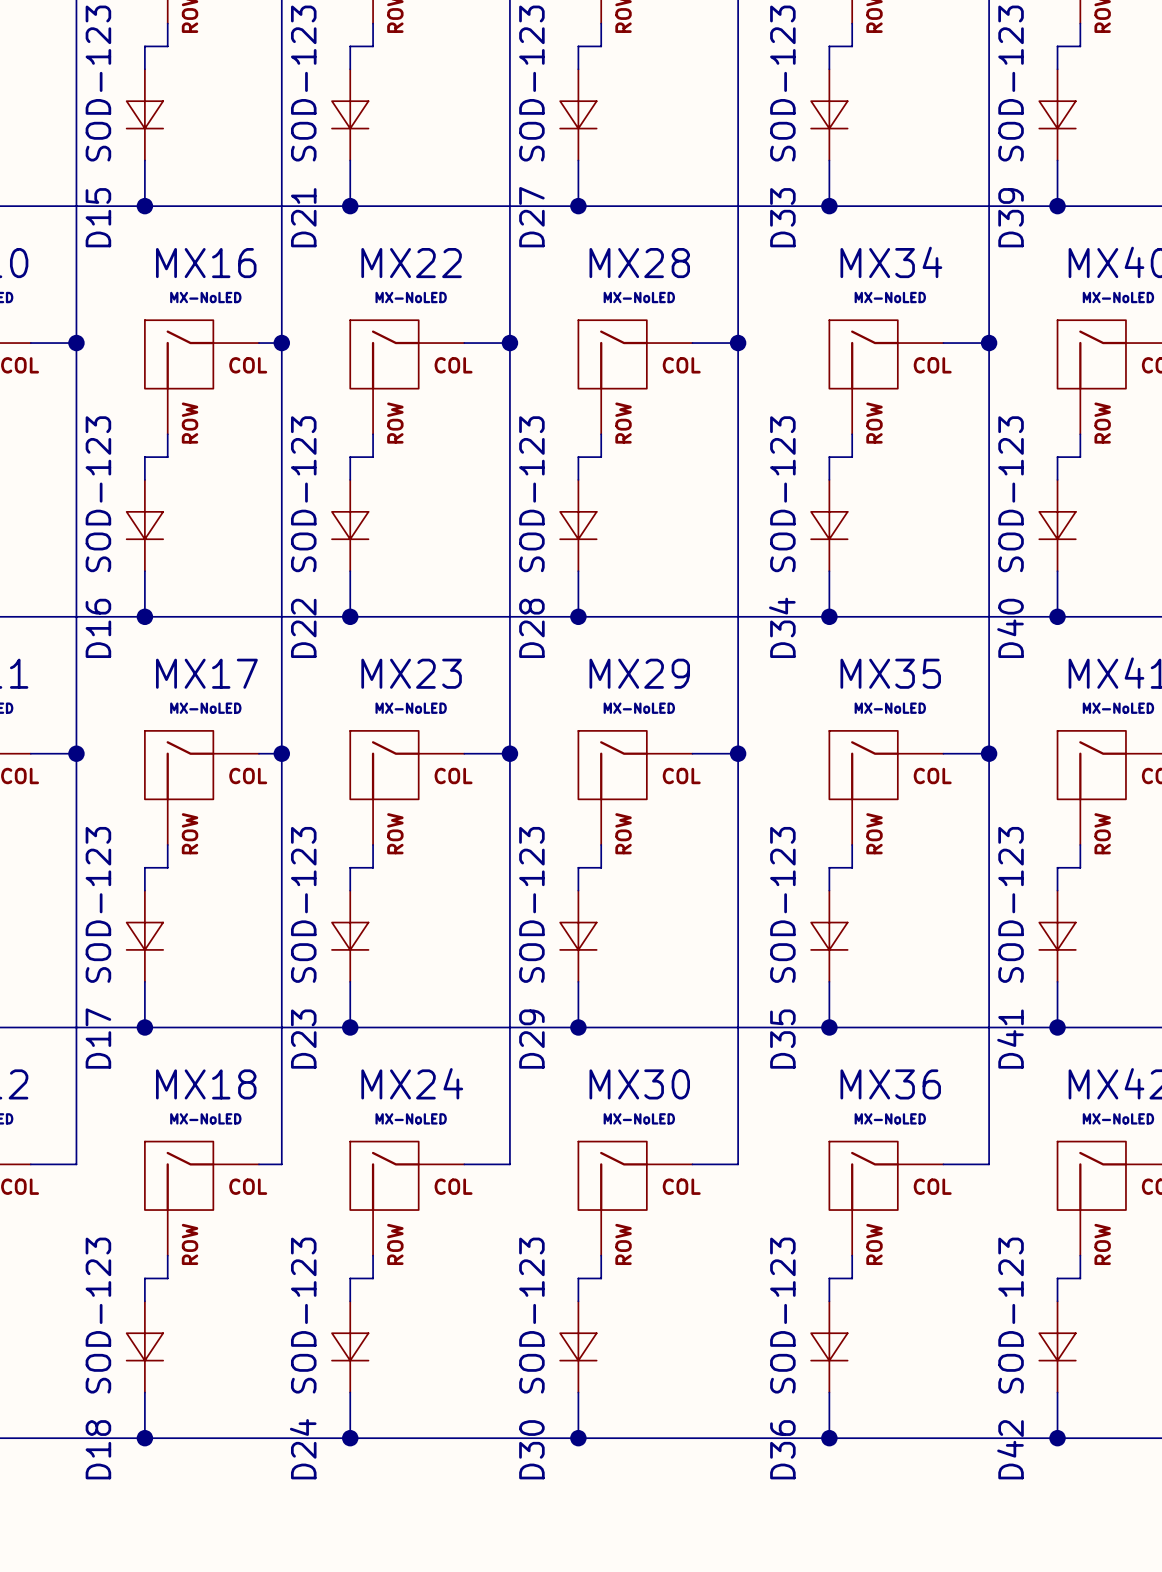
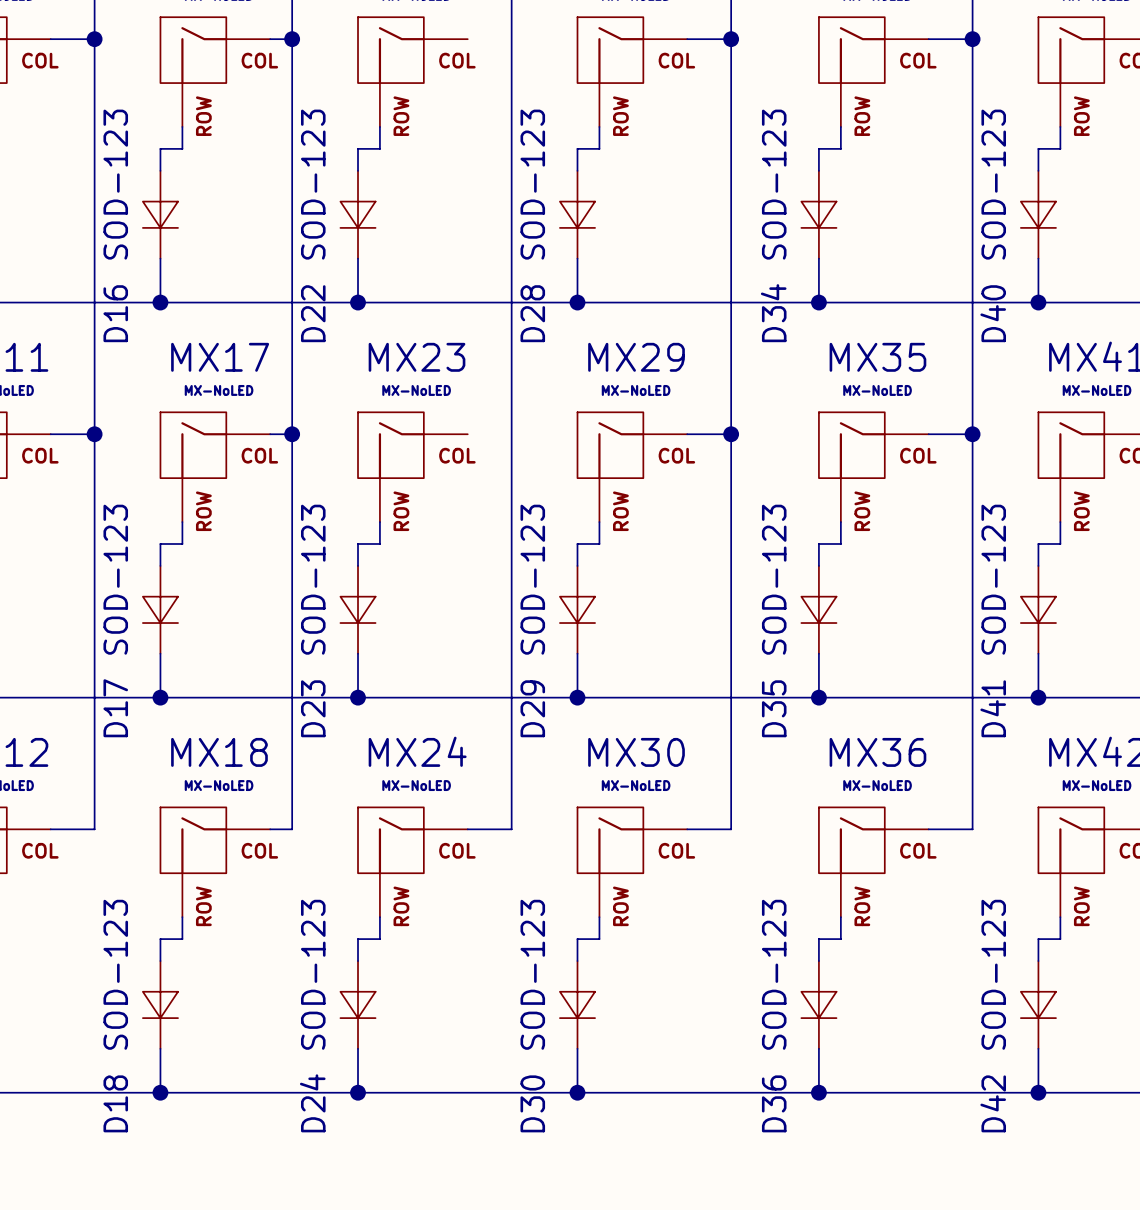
wire: (464, 343) (509, 343) -> none
junction: (509, 343) -> none
wire: (464, 753) (509, 753) -> none
junction: (509, 753) -> none

